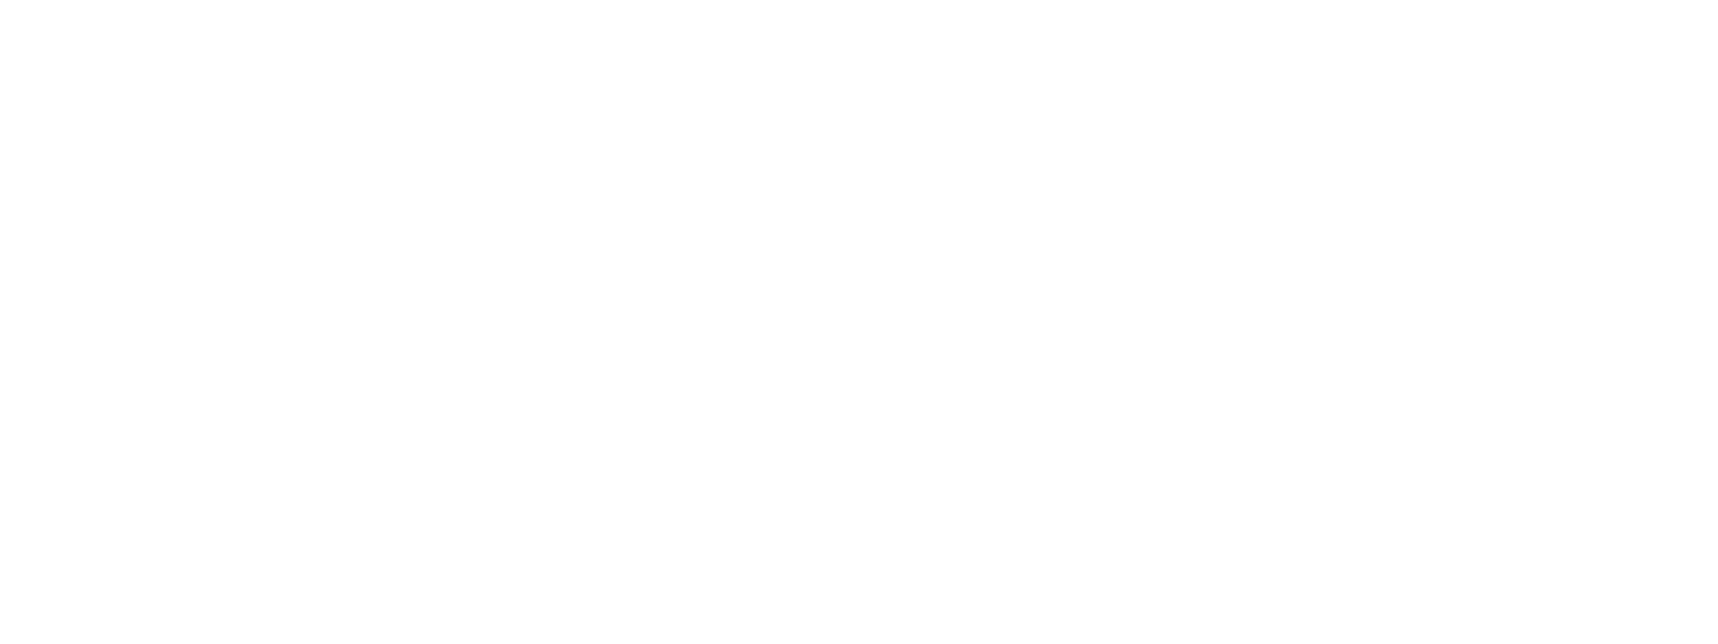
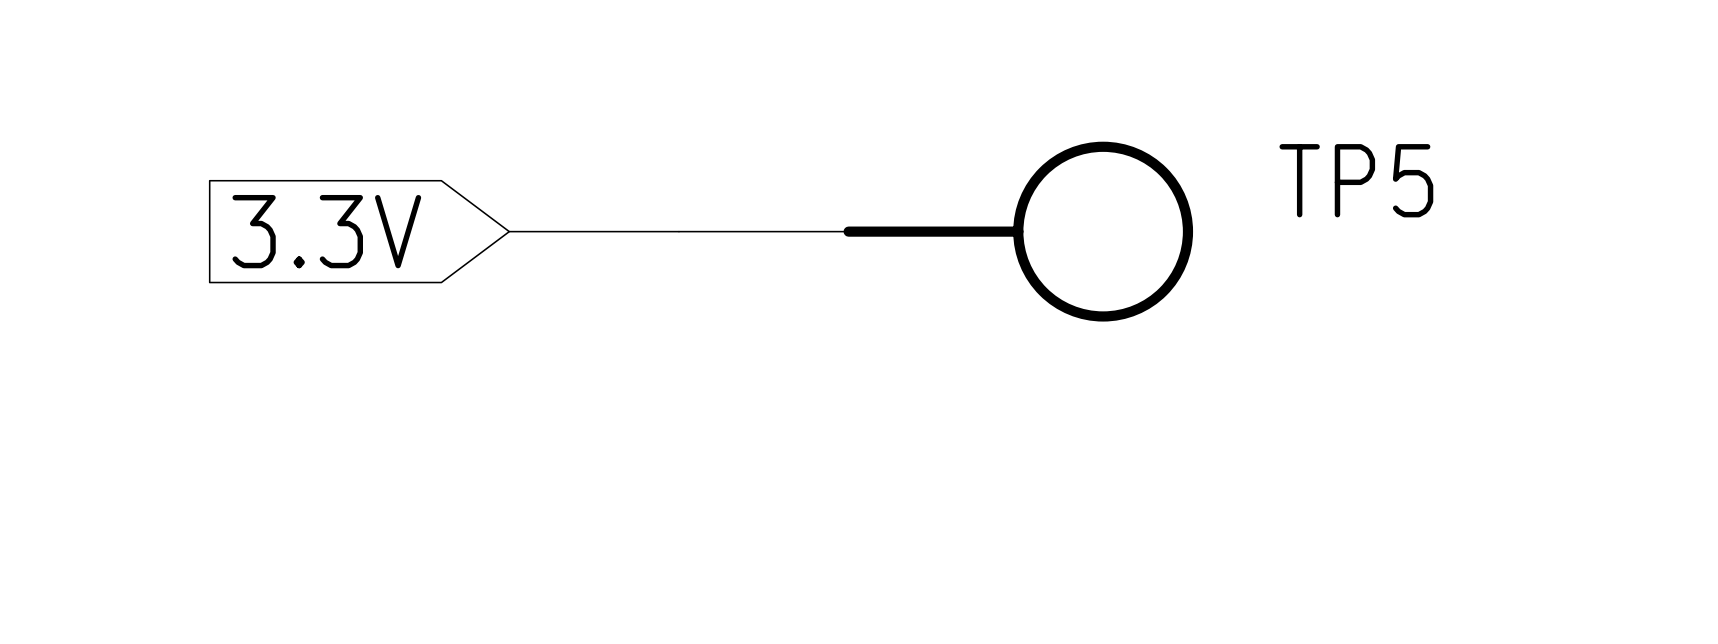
global label: none -> 3.3V (326, 231)
wire: none -> (509, 231) (678, 231)
TP5: none -> (936, 231)

